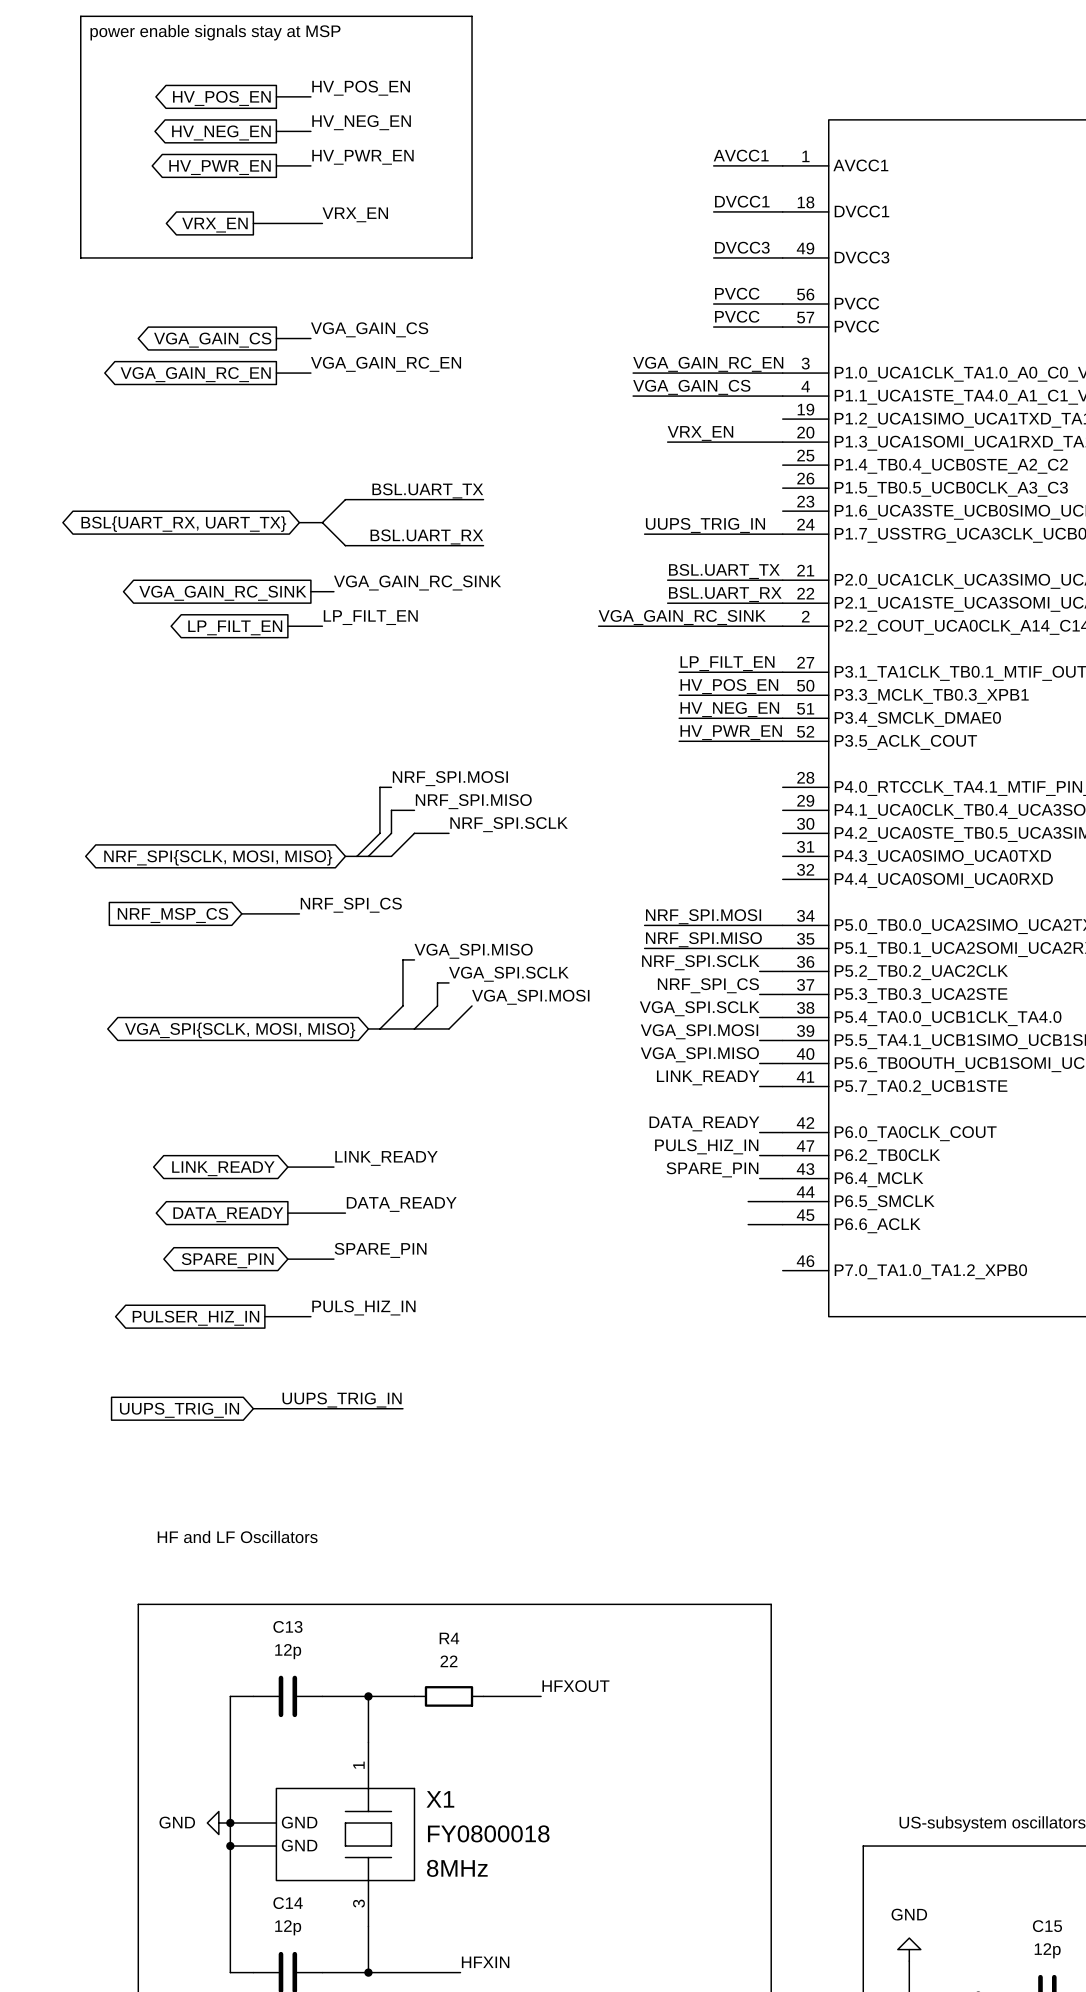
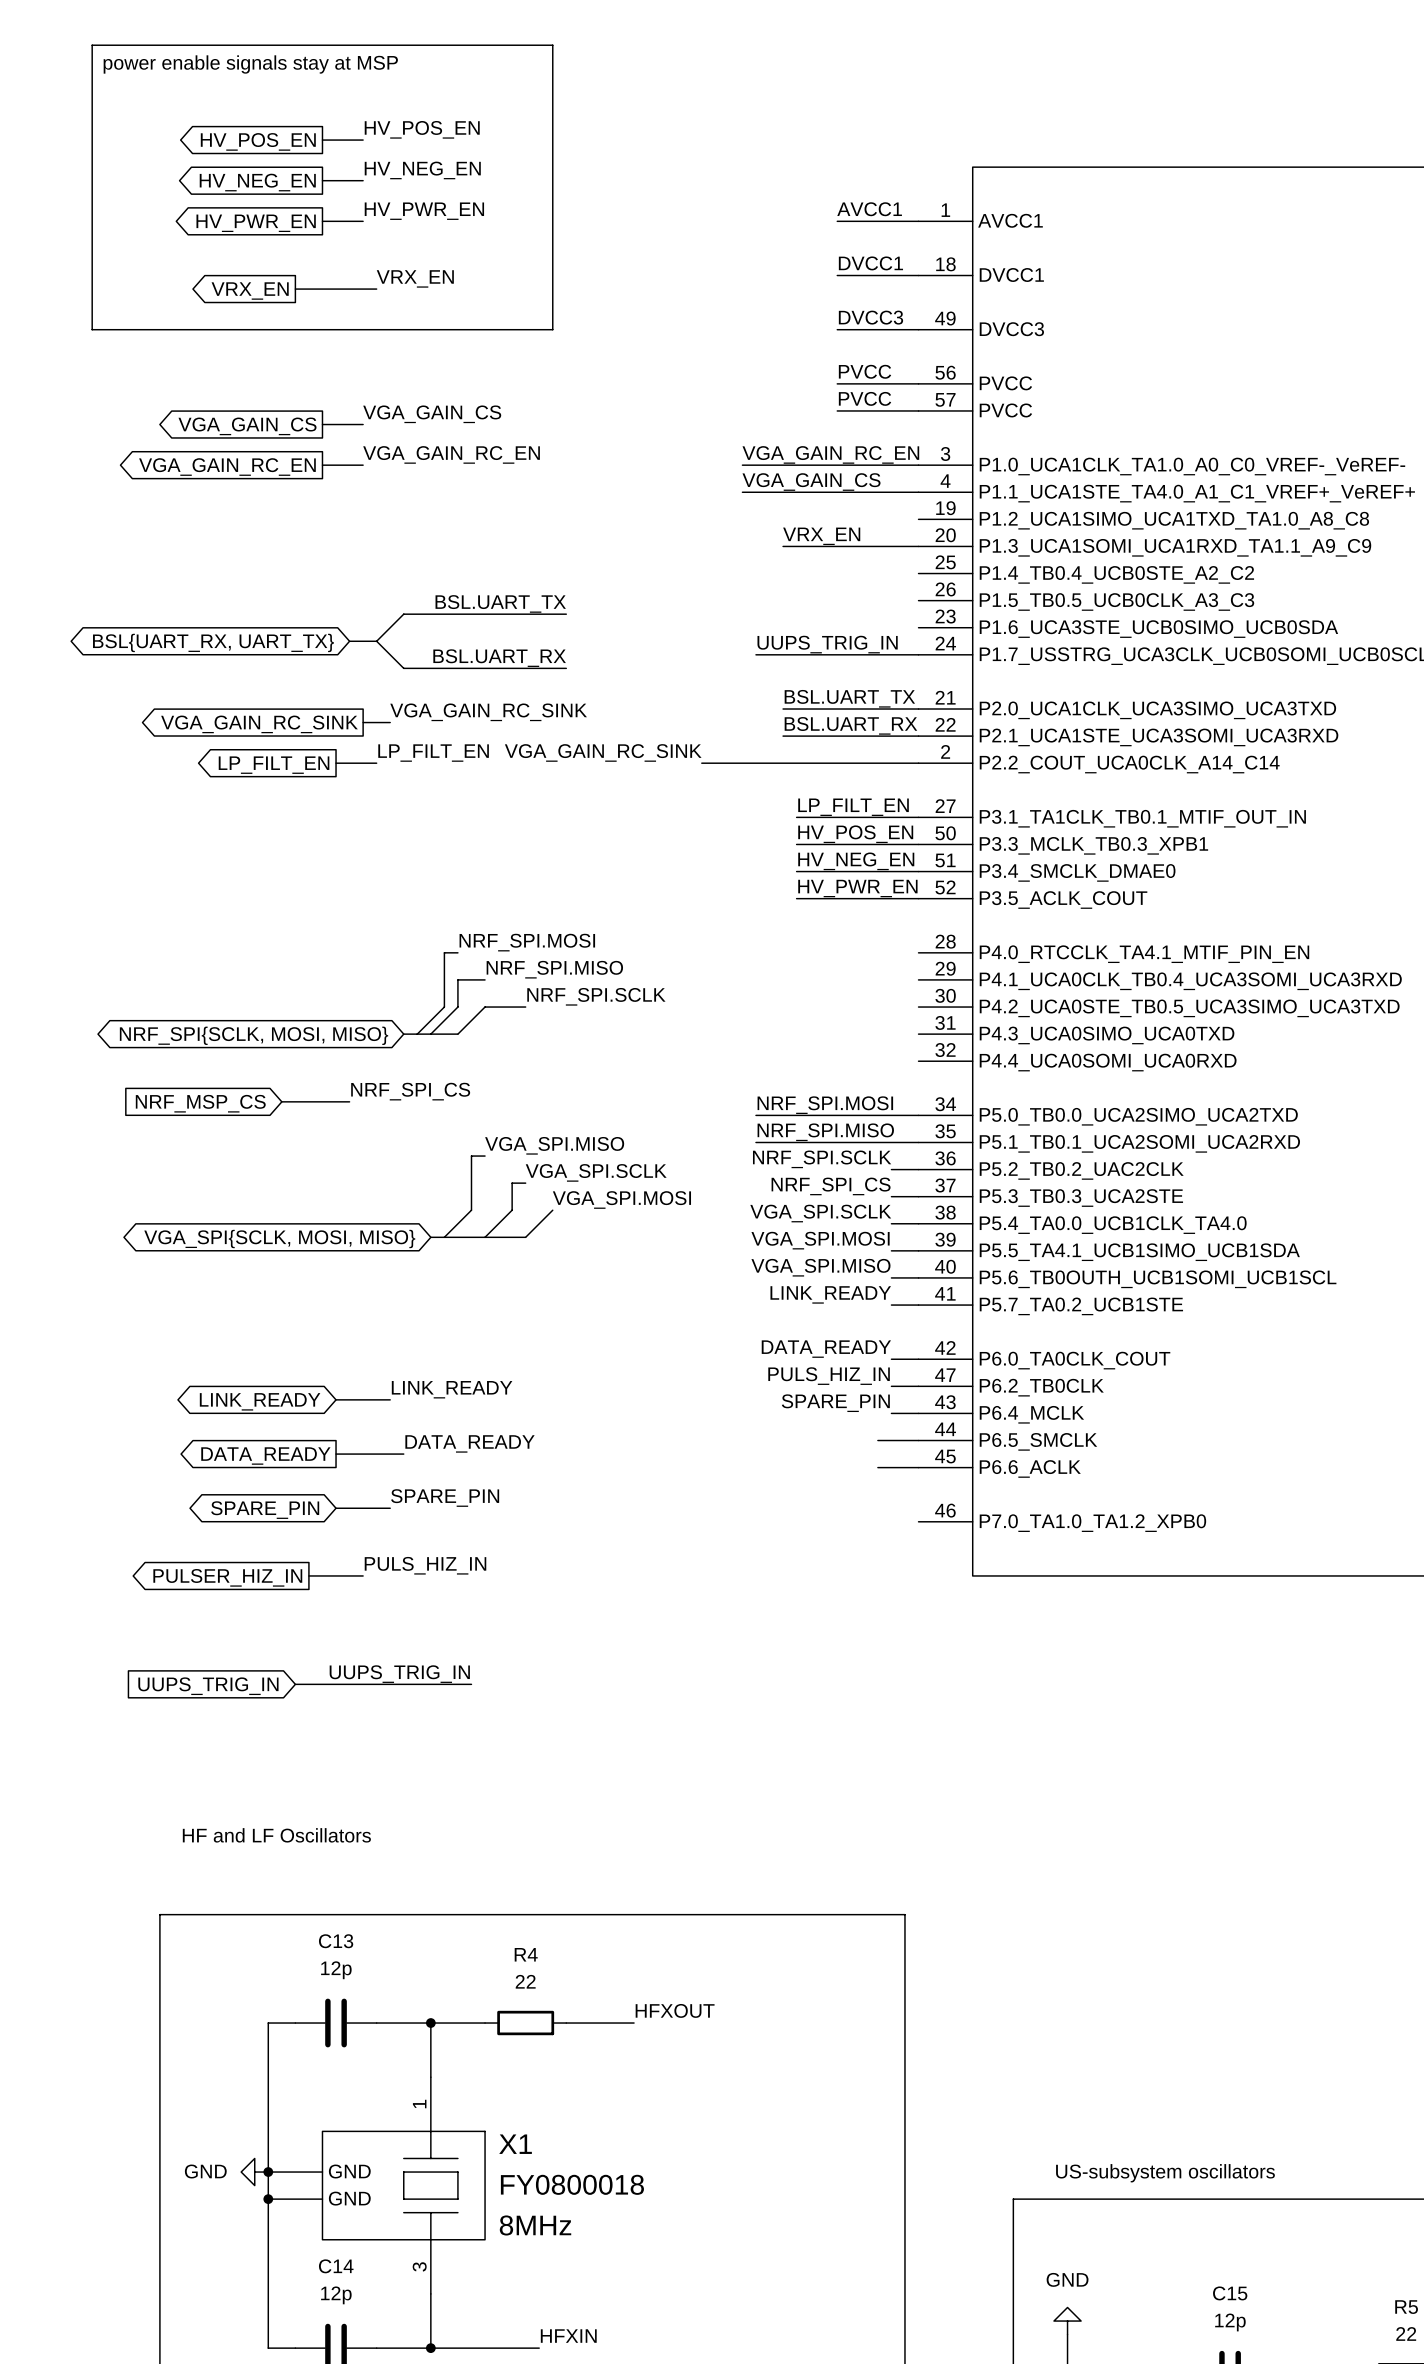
label position: VGA_GAIN_RC_SINK (682, 617) -> VGA_GAIN_RC_SINK (603, 752)

